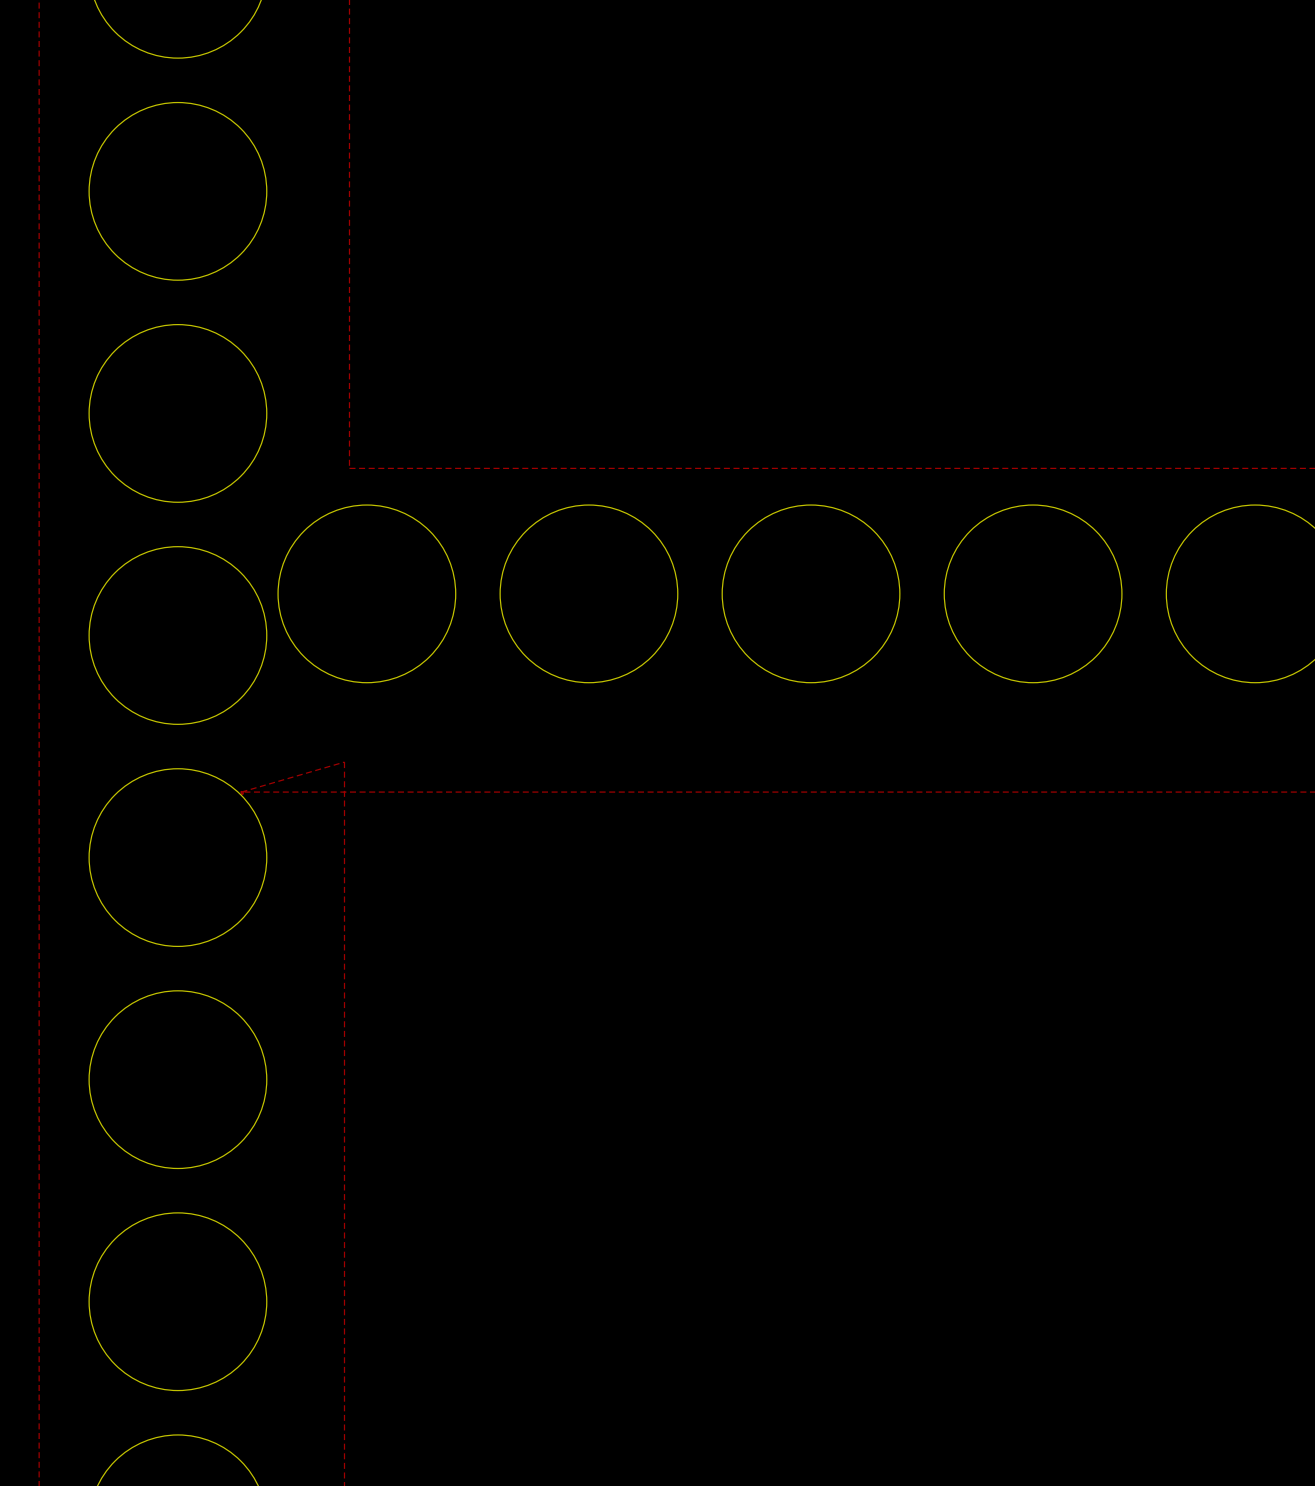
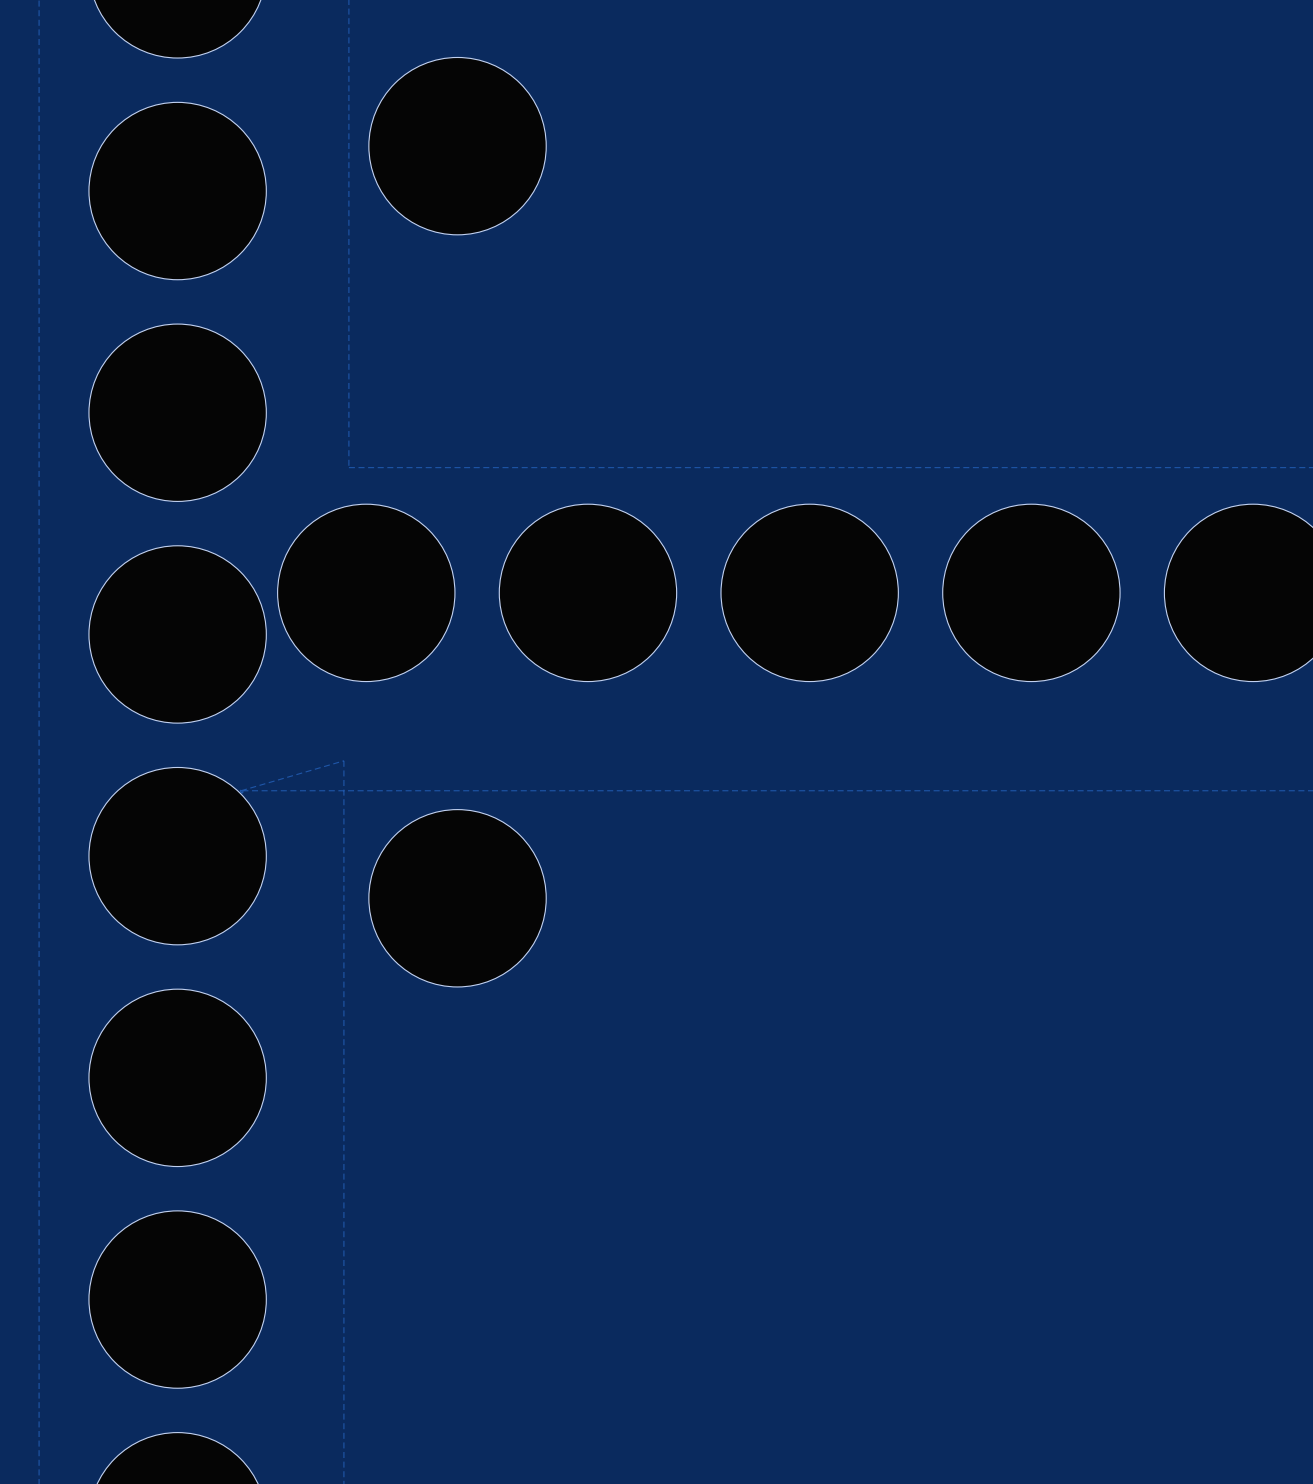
part: none -> (457, 146)
part: none -> (457, 898)

